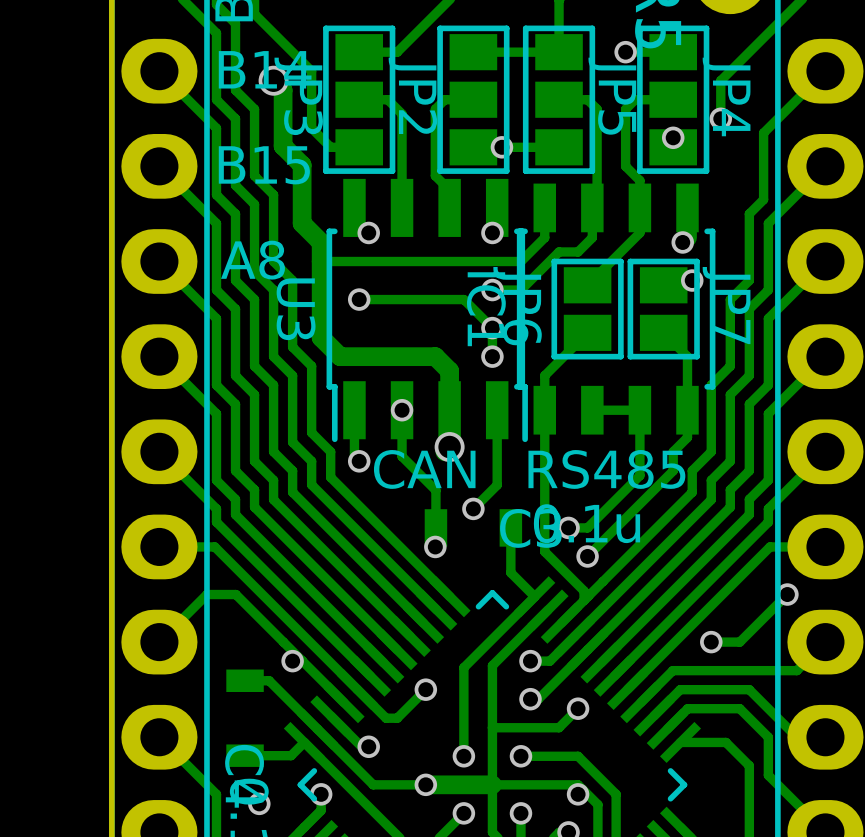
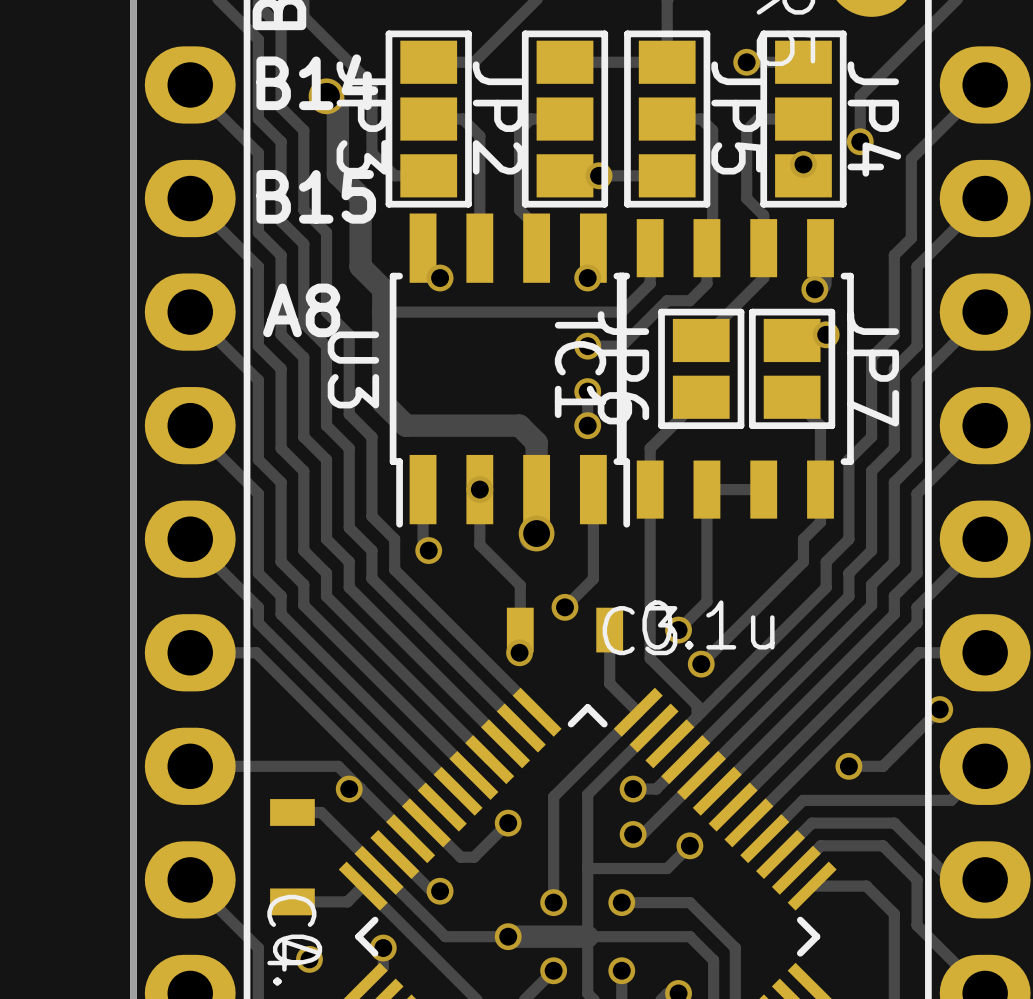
track: (359, 299) (463, 299) (492, 328) -> none
via: (359, 299) -> none
track: (639, 410) (639, 475) (587, 527) (568, 527) -> (706, 489) (706, 601) (678, 630)
text: CAN (424, 469) -> none
text: RS485 (606, 469) -> none
track: (283, 642) (235, 594) (206, 594) (159, 642) -> (338, 766) (190, 766)
via: (578, 794) -> none

